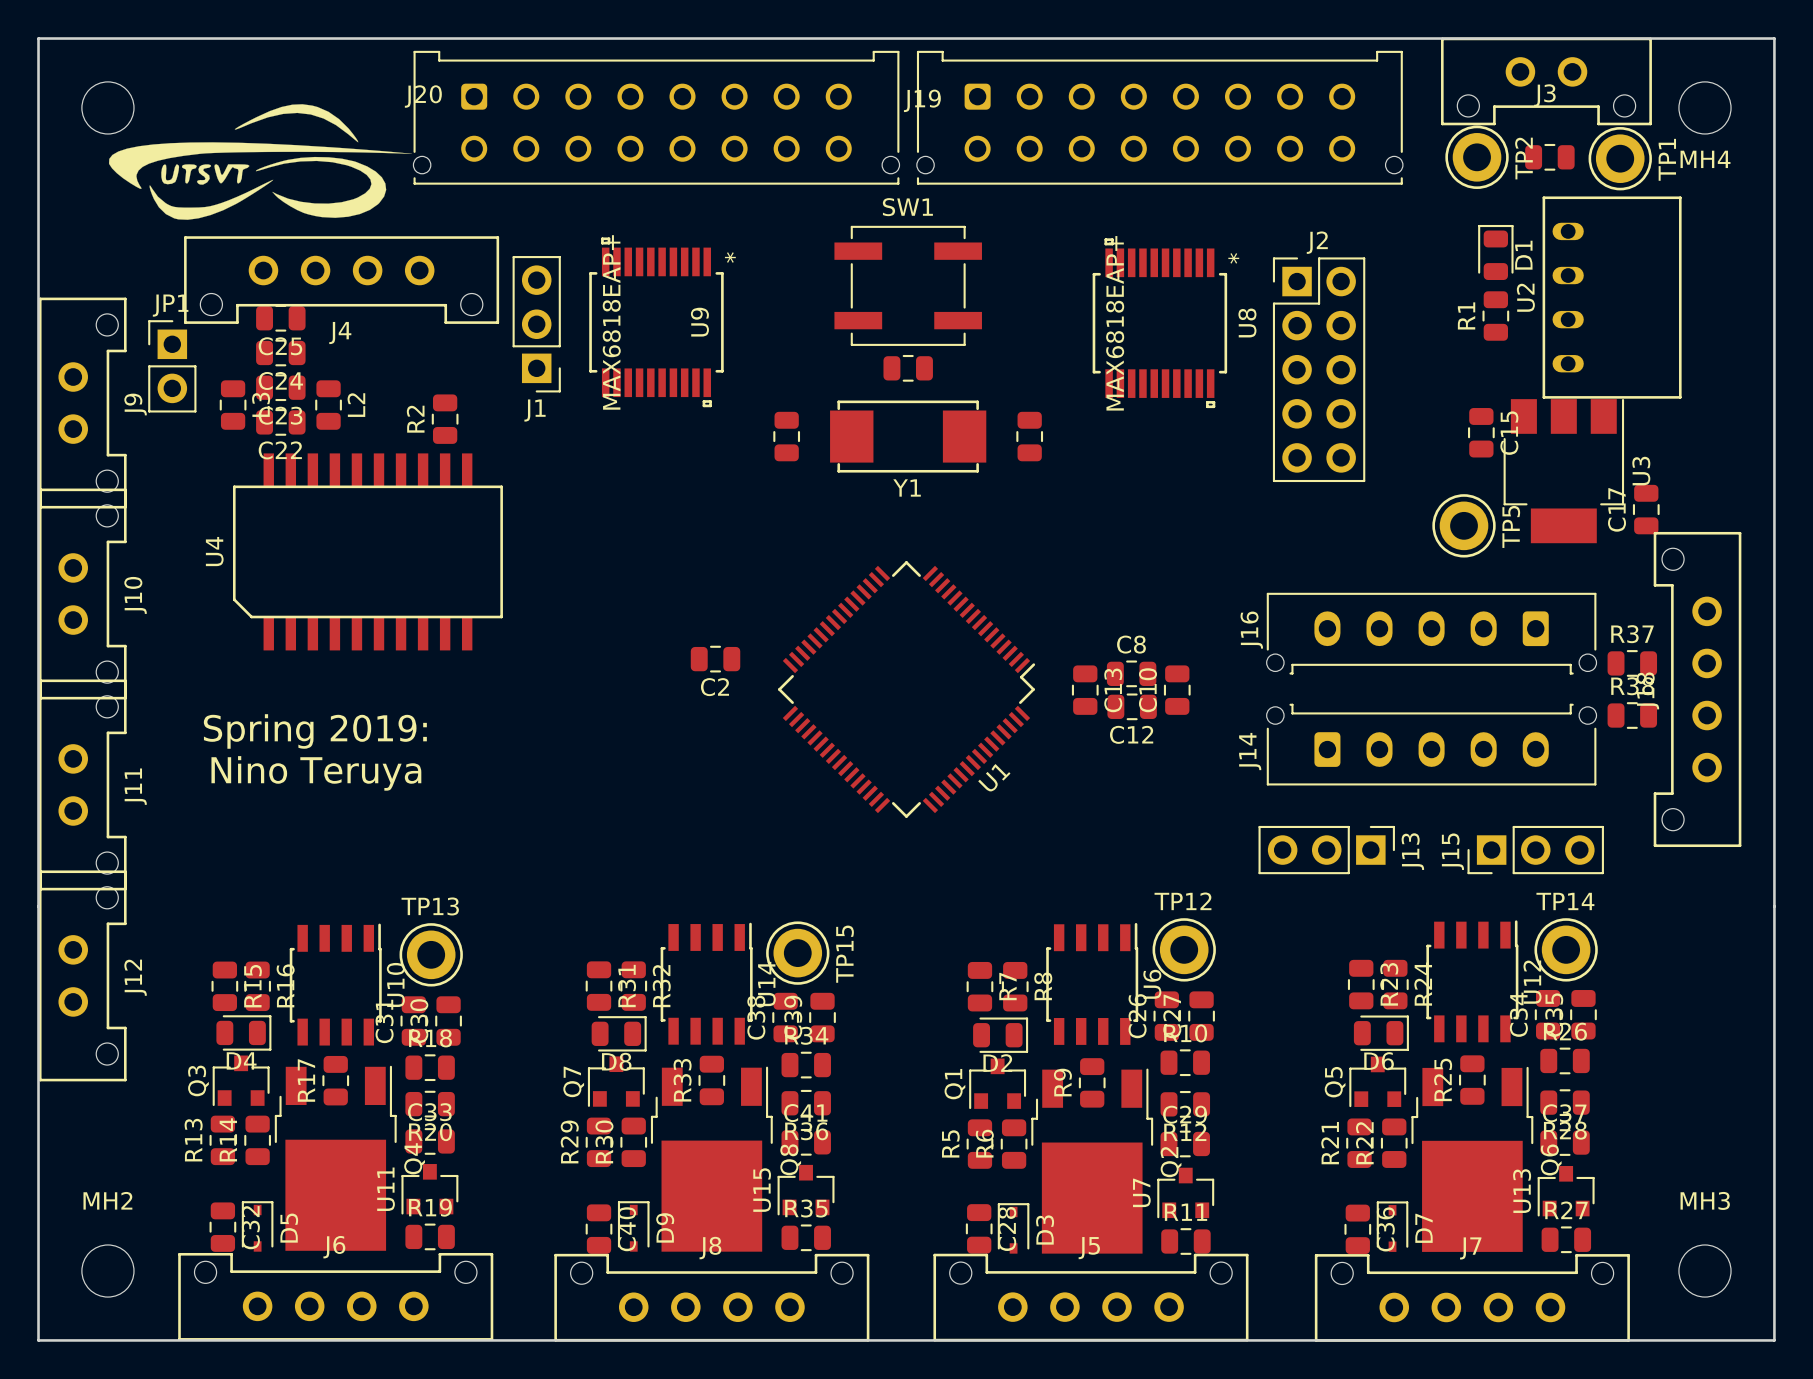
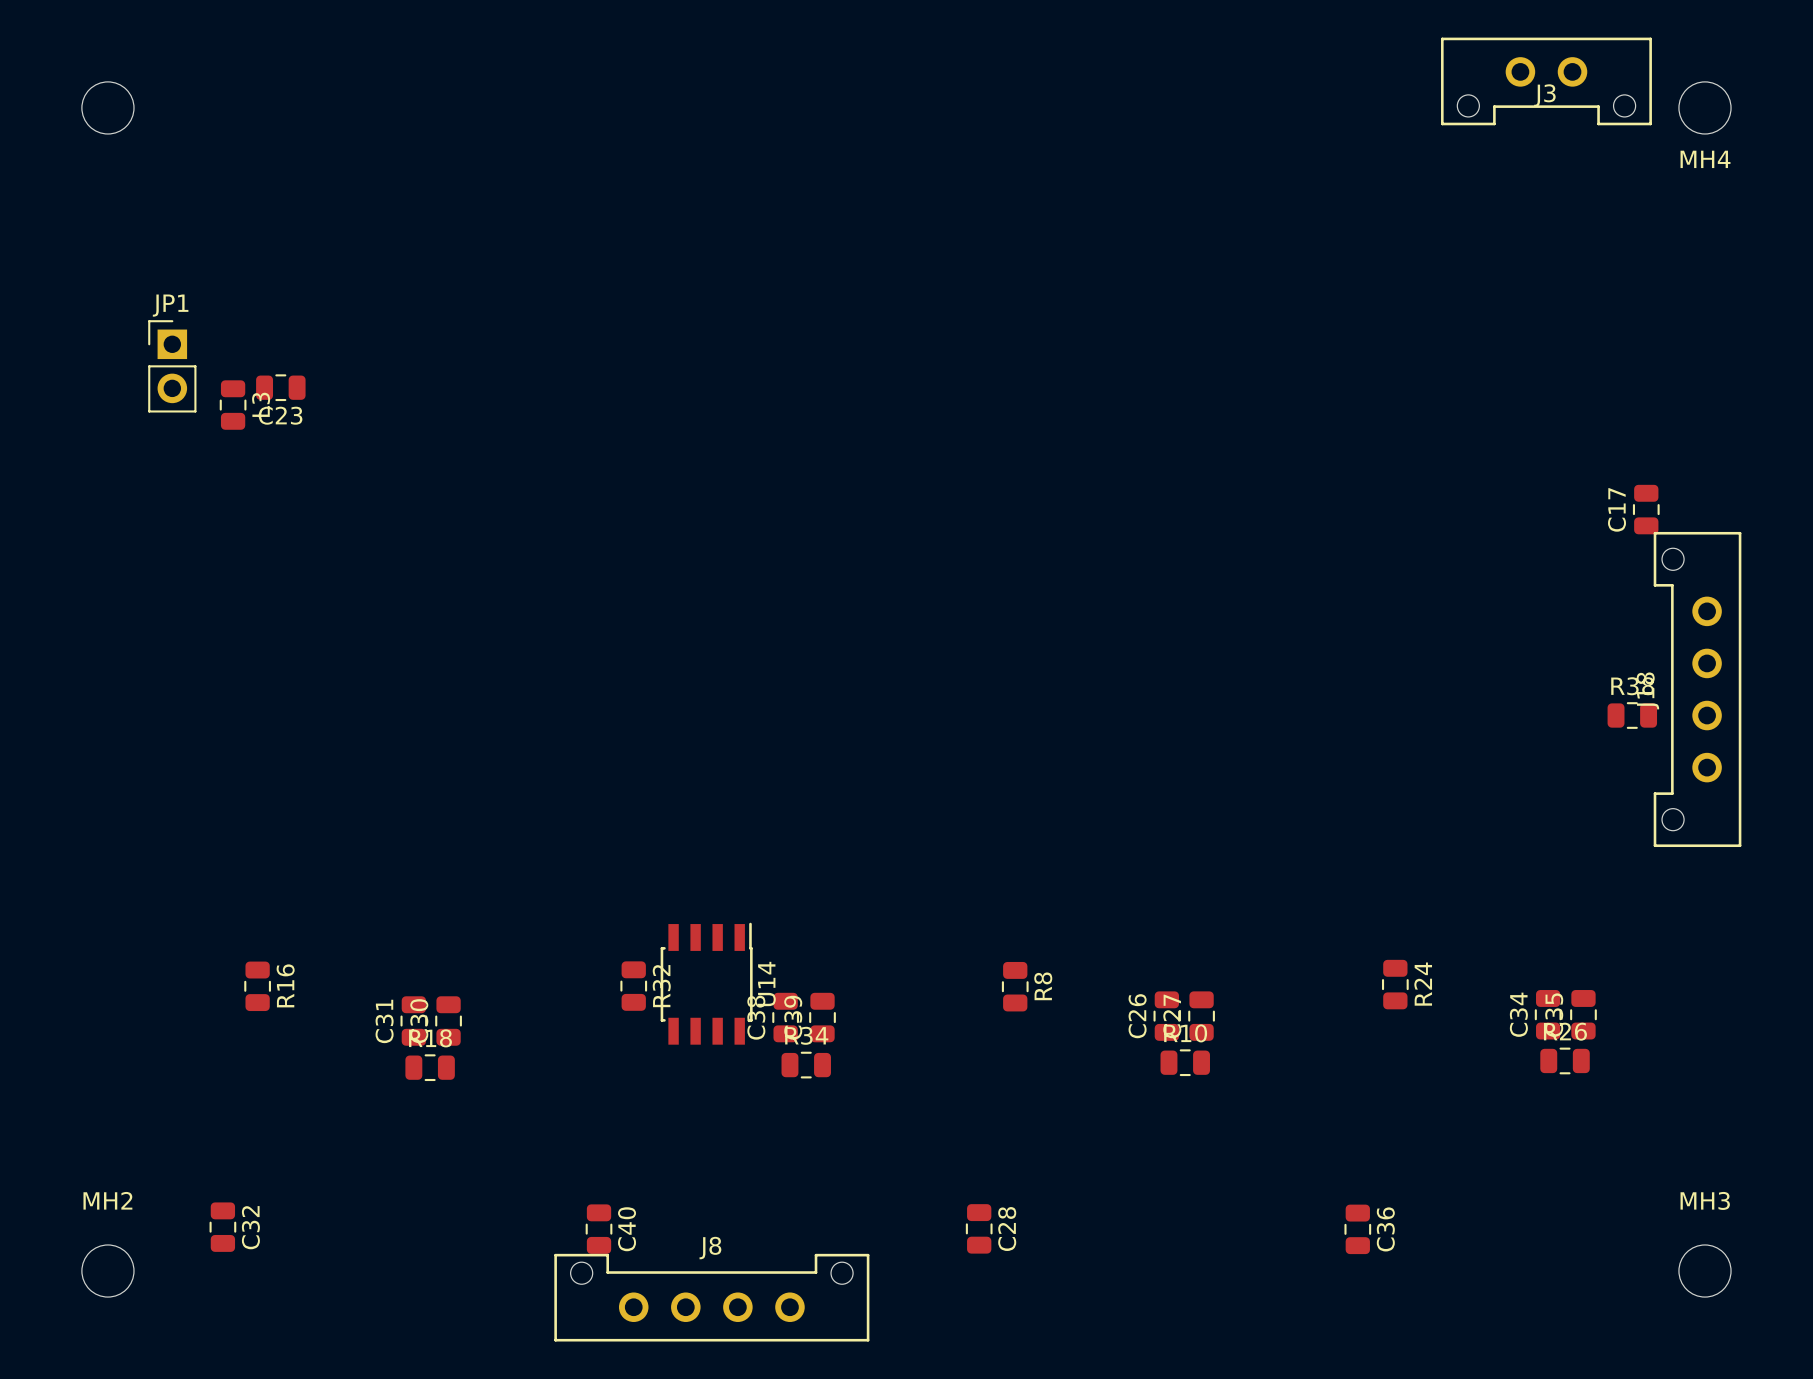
board edge: (38, 38) (38, 1340) (1774, 1340) (1774, 38) (38, 38) -> none
drawing: [108, 104, 413, 220] -> none
J20: (656, 117) -> none
J19: (1159, 117) -> none
TP2: (1477, 157) -> none
part: (1549, 157) -> none
TP1: (1620, 158) -> none
D1: (1495, 252) -> none
J4: (341, 280) -> none
SW1: (908, 285) -> none
U2: (1612, 297) -> none
R1: (1495, 316) -> none
C25: (280, 318) -> none
U9: MAX6818EAP+ (656, 322) -> none
U8: MAX6818EAP+ (1159, 323) -> none
J1: (536, 324) -> none
C24: (280, 352) -> none
part: (908, 368) -> none
J2: (1319, 369) -> none
J9: (82, 403) -> none
L2: (328, 405) -> none
R2: (445, 419) -> none
C22: (280, 422) -> none
C15: (1481, 432) -> none
part: (786, 436) -> none
Y1: (908, 436) -> none
part: (1029, 436) -> none
U3: (1563, 471) -> none
TP5: (1464, 525) -> none
U4: (367, 551) -> none
J10: (82, 594) -> none
J16: (1431, 633) -> none
C2: (715, 659) -> none
R37: (1632, 663) -> none
C8: (1131, 673) -> none
U1: (906, 689) -> none
C13: (1085, 690) -> none
C10: (1177, 690) -> none
C12: (1132, 706) -> none
text: Spring 2019: (315, 731) -> none
J14: (1431, 744) -> none
text: Nino Teruya (316, 773) -> none
J11: (82, 784) -> none
J13: (1326, 850) -> none
J15: (1535, 850) -> none
TP12: (1184, 949) -> none
TP14: (1566, 949) -> none
TP15: (797, 953) -> none
TP13: (431, 954) -> none
J12: (82, 975) -> none
U12: (1472, 981) -> none
U6: (1092, 983) -> none
U10: (335, 984) -> none
R23: (1361, 984) -> none
R15: (224, 986) -> none
R31: (599, 986) -> none
R7: (979, 986) -> none
D4: (243, 1032) -> none
D8: (619, 1033) -> none
D6: (1381, 1033) -> none
D2: (1000, 1035) -> none
Q3: (241, 1080) -> none
R17: (335, 1080) -> none
R33: (711, 1080) -> none
R25: (1472, 1080) -> none
Q7: (616, 1081) -> none
Q5: (1377, 1081) -> none
R9: (1092, 1082) -> none
Q1: (997, 1083) -> none
R28: (1565, 1102) -> none
R36: (806, 1103) -> none
R20: (430, 1104) -> none
R12: (1185, 1104) -> none
R13: (222, 1140) -> none
R14: (257, 1140) -> none
C33: (430, 1141) -> none
R29: (599, 1142) -> none
R30: (633, 1142) -> none
C41: (806, 1142) -> none
C37: (1565, 1142) -> none
C29: (1185, 1143) -> none
R21: (1359, 1143) -> none
R22: (1394, 1143) -> none
R5: (979, 1144) -> none
R6: (1014, 1144) -> none
Q4: (335, 1158) -> none
Q8: (711, 1159) -> none
Q6: (1472, 1159) -> none
Q2: (1092, 1161) -> none
U11: (429, 1189) -> none
U15: (806, 1190) -> none
U13: (1566, 1191) -> none
U7: (1185, 1192) -> none
D5: (257, 1226) -> none
D9: (633, 1226) -> none
D7: (1392, 1226) -> none
D3: (1013, 1228) -> none
R19: (430, 1236) -> none
R35: (806, 1237) -> none
R27: (1566, 1239) -> none
R11: (1185, 1241) -> none
J6: (335, 1296) -> none
J5: (1090, 1297) -> none
J7: (1472, 1297) -> none

